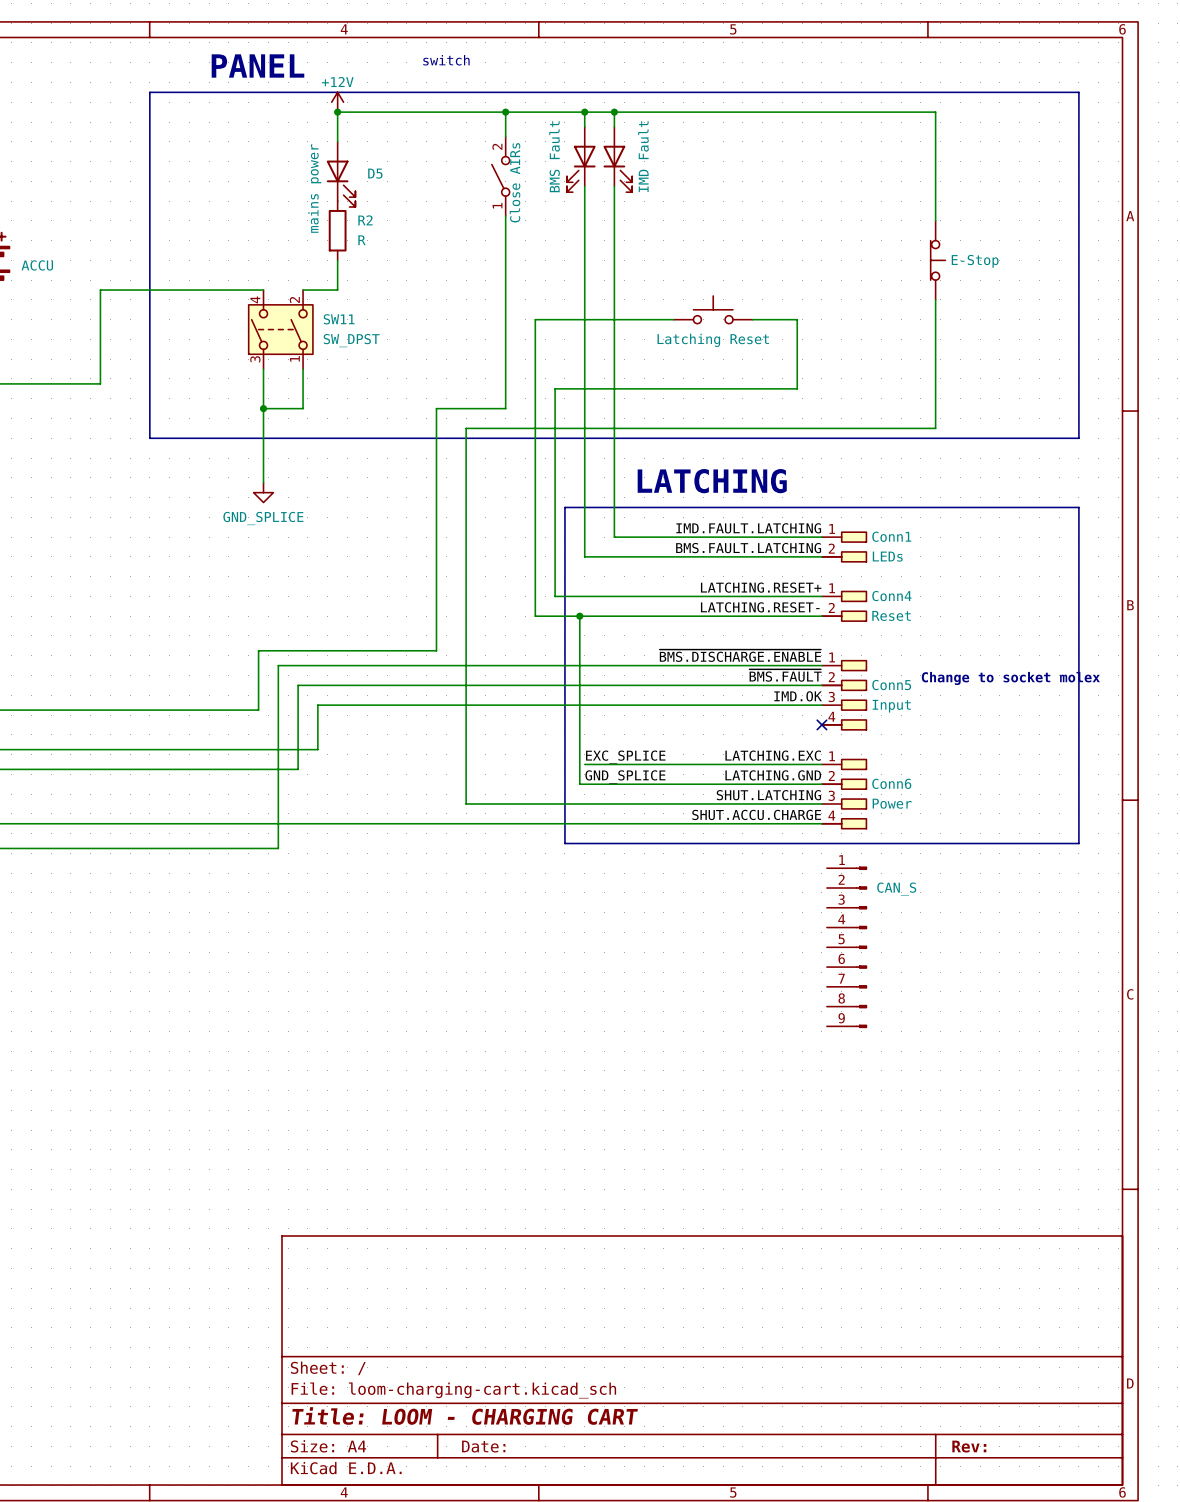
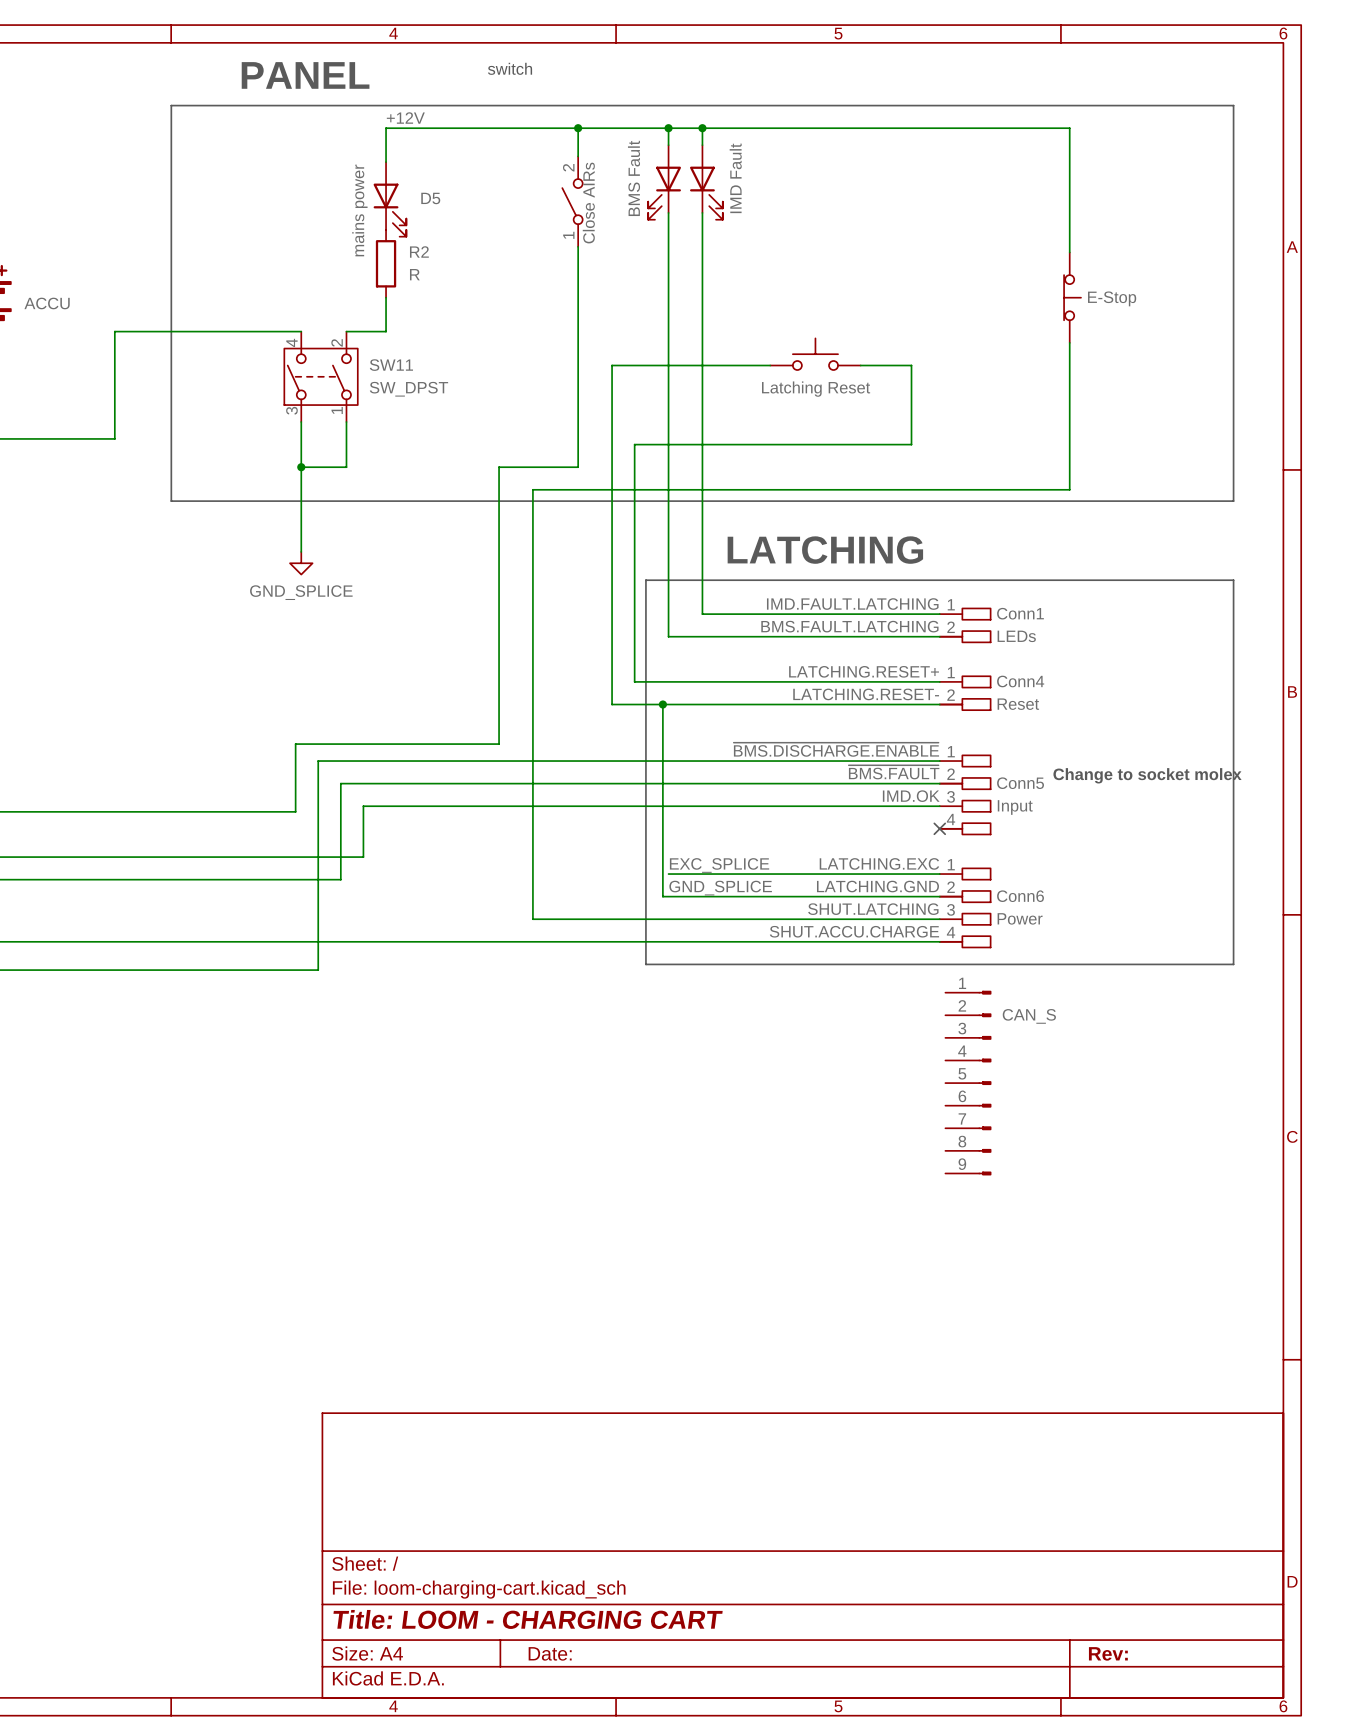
power symbol: +12V (337, 102) -> none
label: none -> +12V (405, 118)
junction: (337, 112) -> none

